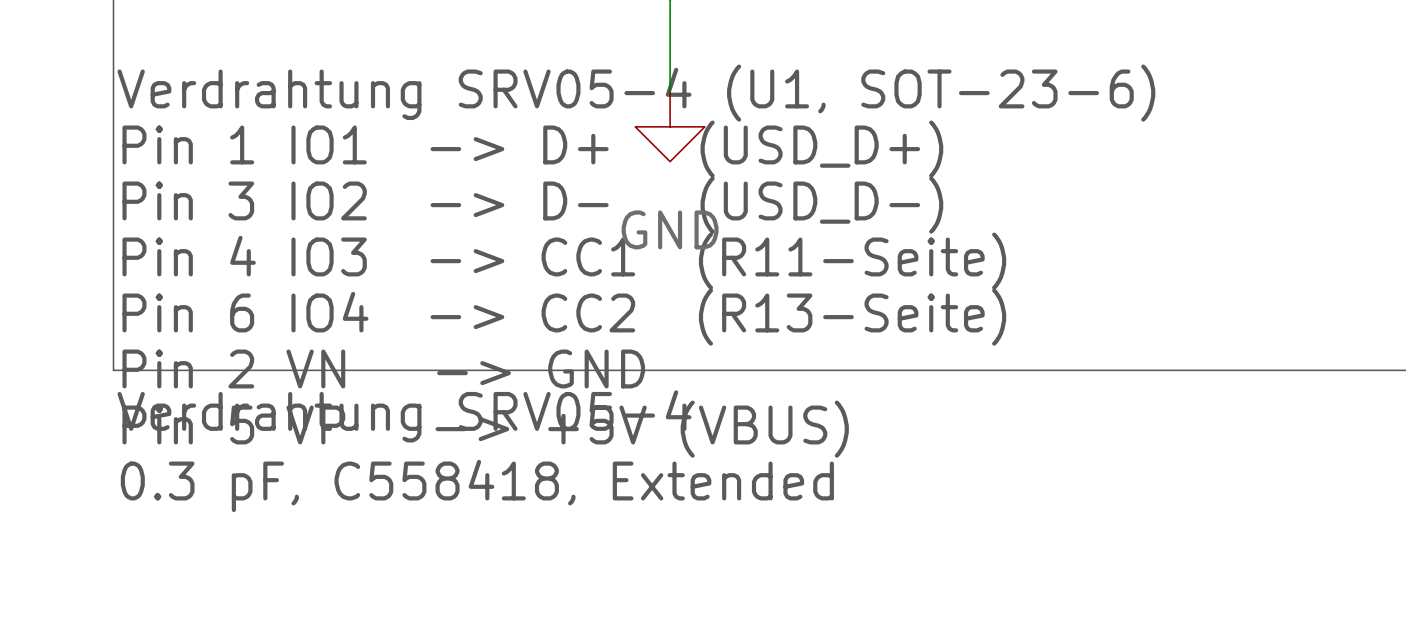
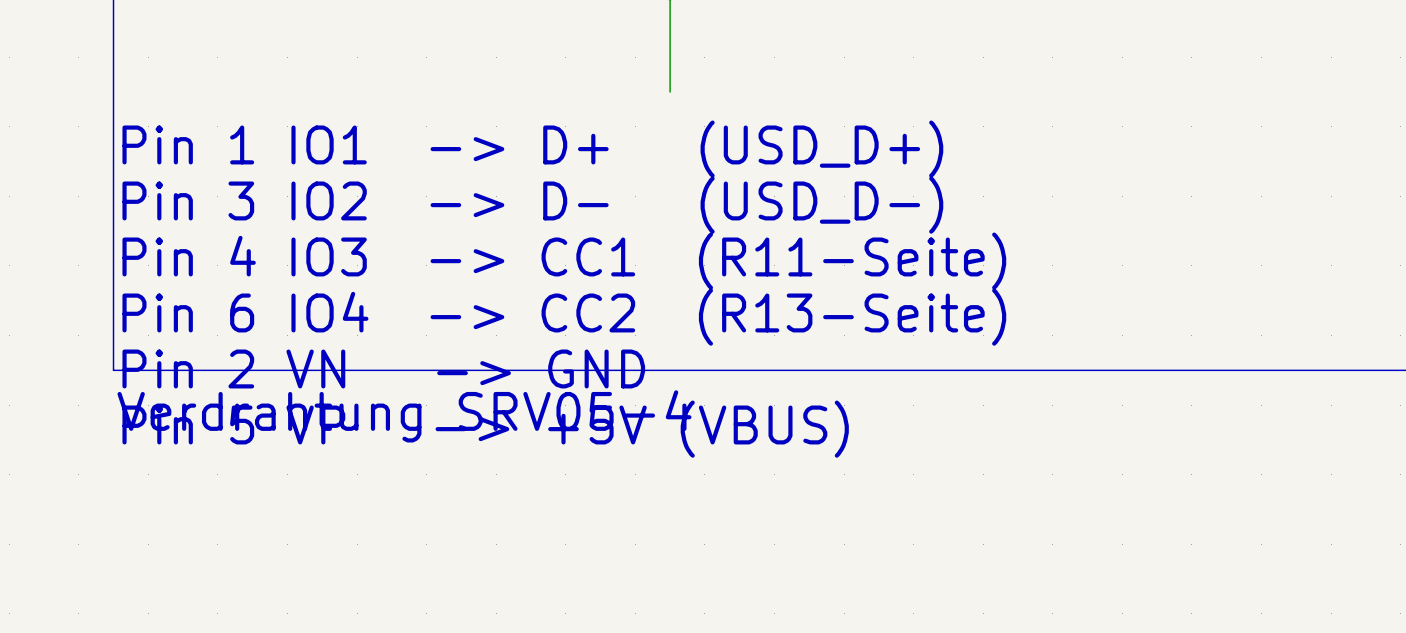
text: Verdrahtung SRV05-4 (U1, SOT-23-6) (636, 93) -> none
power symbol: GND (670, 126) -> none
text: 0.3 pF, C558418, Extended (477, 485) -> none

